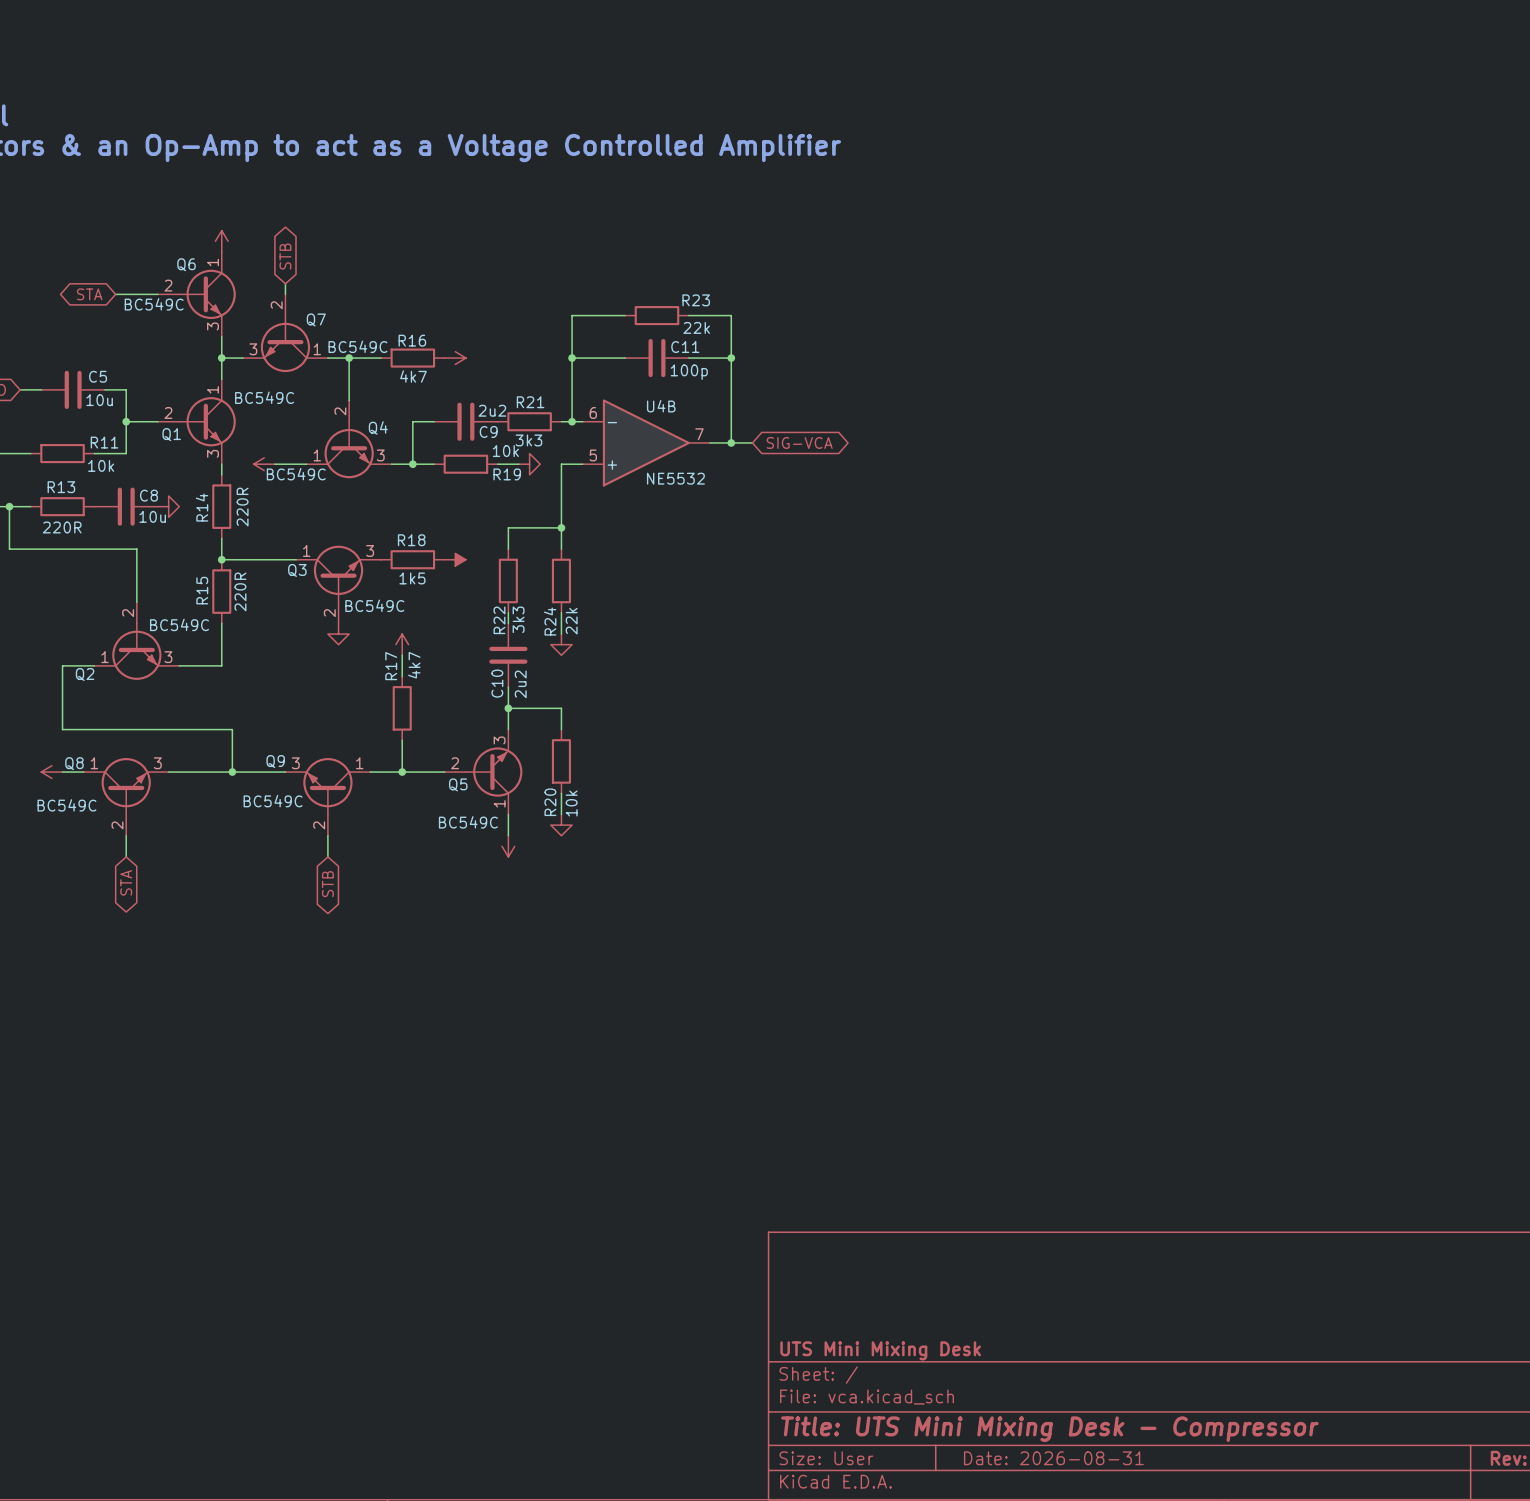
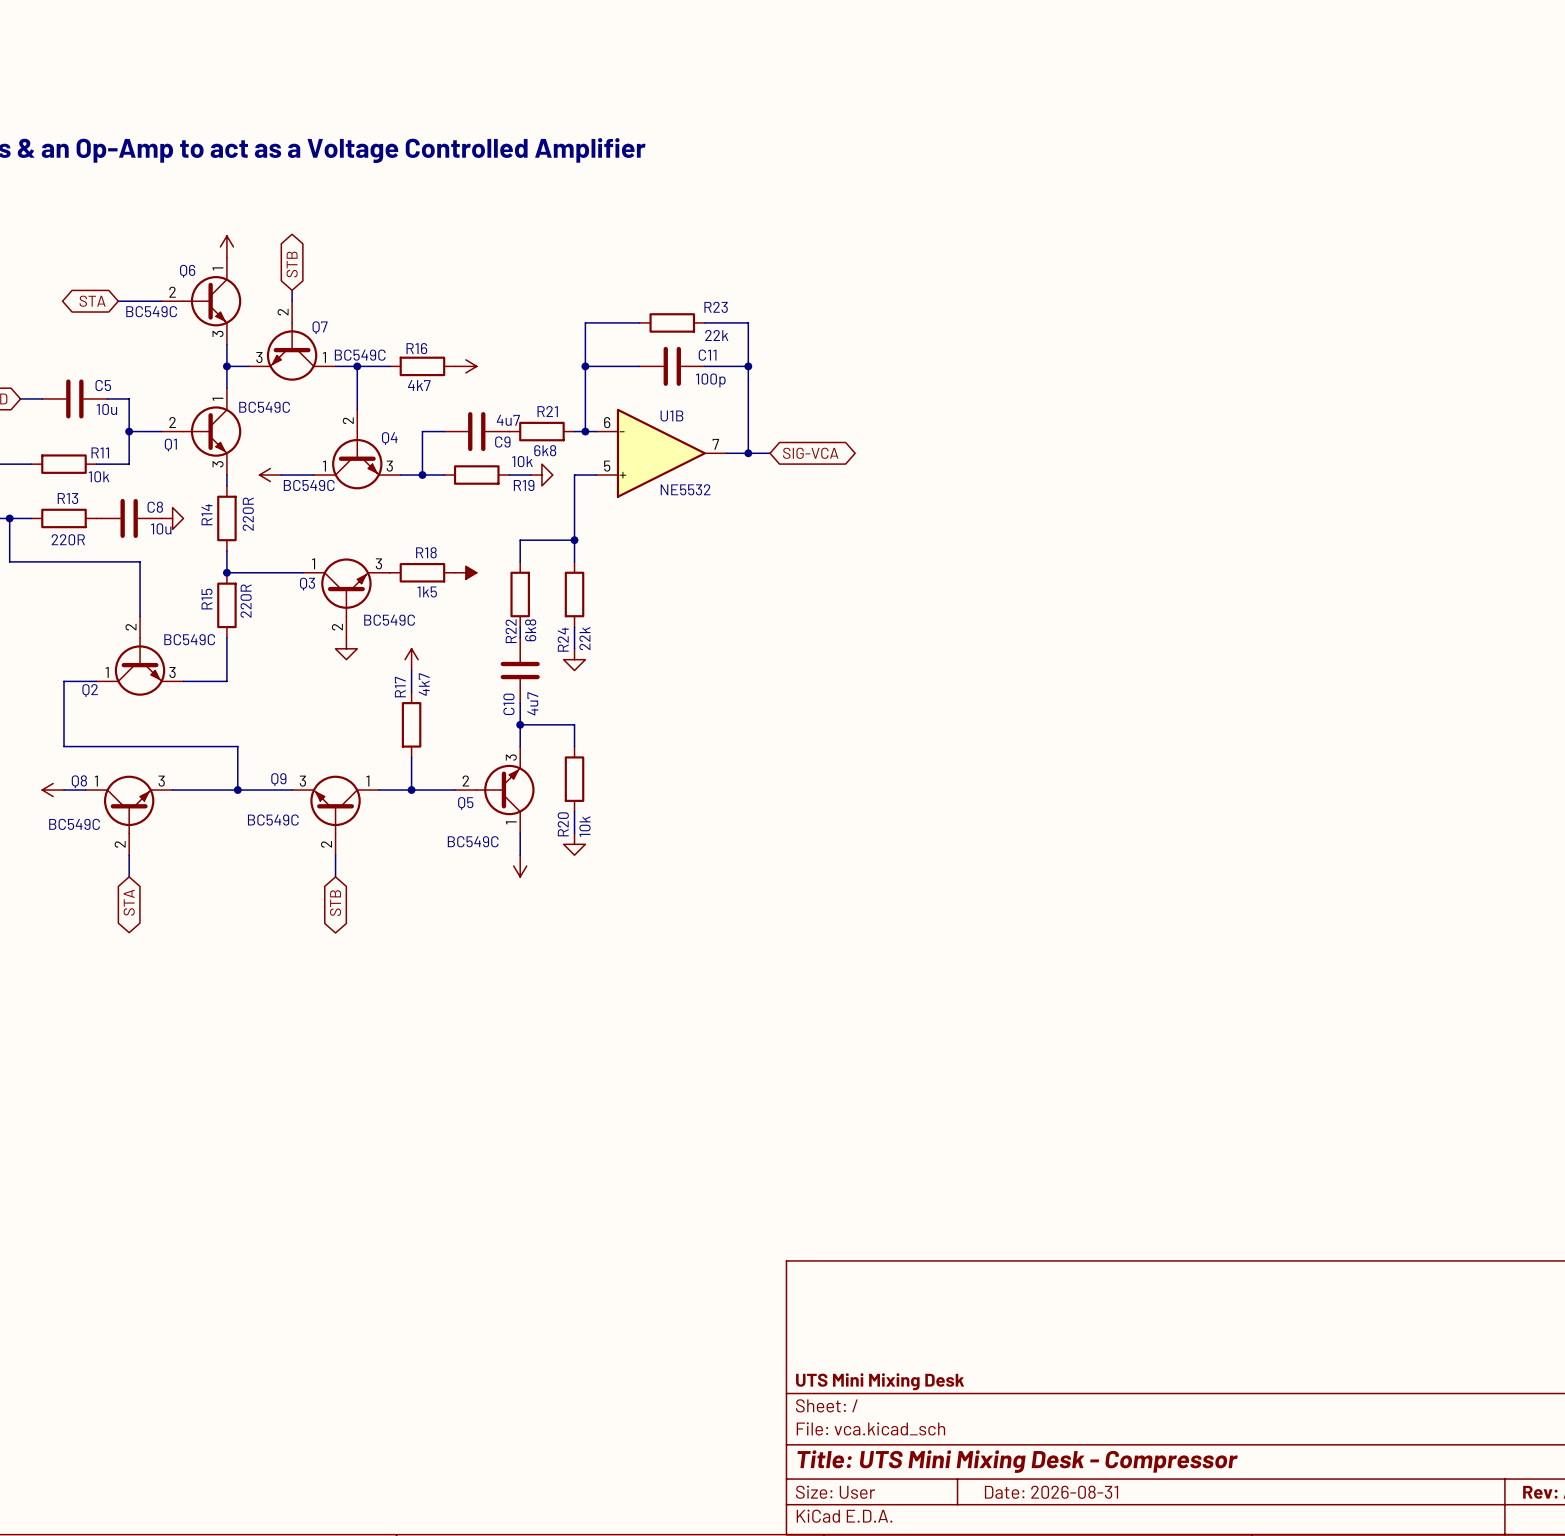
U4B name: U4B (661, 406) -> U1B (671, 416)
C9 value: 2u2 (492, 410) -> 4u7 (508, 420)
R21 value: 3k3 (528, 440) -> 6k8 (545, 450)
R22 value: 3k3 (518, 619) -> 6k8 (530, 630)
C10 value: 2u2 (520, 684) -> 4u7 (532, 703)

